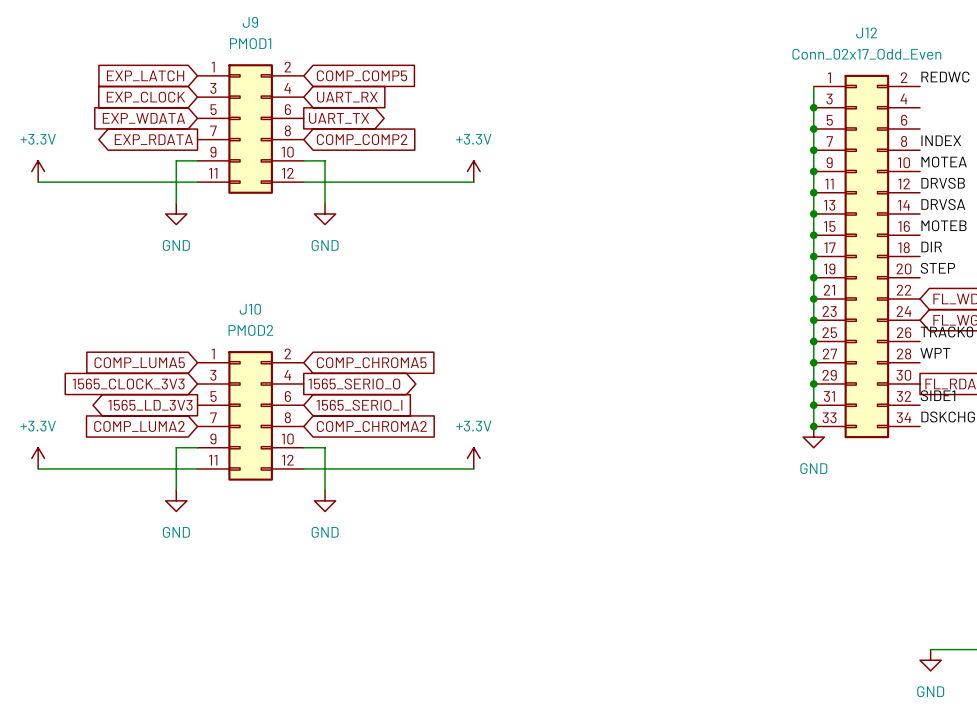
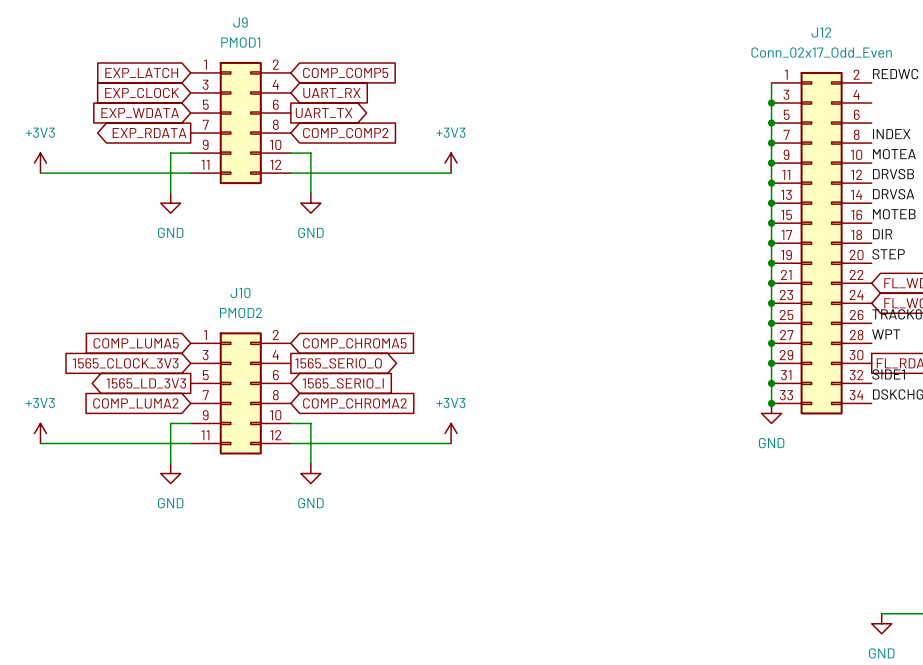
power symbol: +3.3V (38, 171) -> +3V3 (40, 163)
power symbol: +3.3V (473, 171) -> +3V3 (451, 163)
power symbol: +3.3V (38, 458) -> +3V3 (40, 433)
power symbol: +3.3V (473, 458) -> +3V3 (451, 433)

